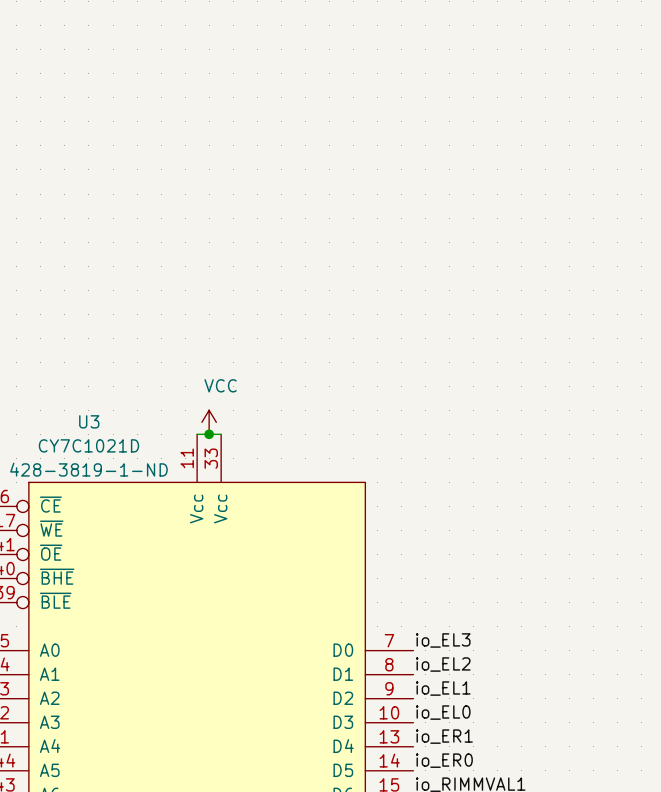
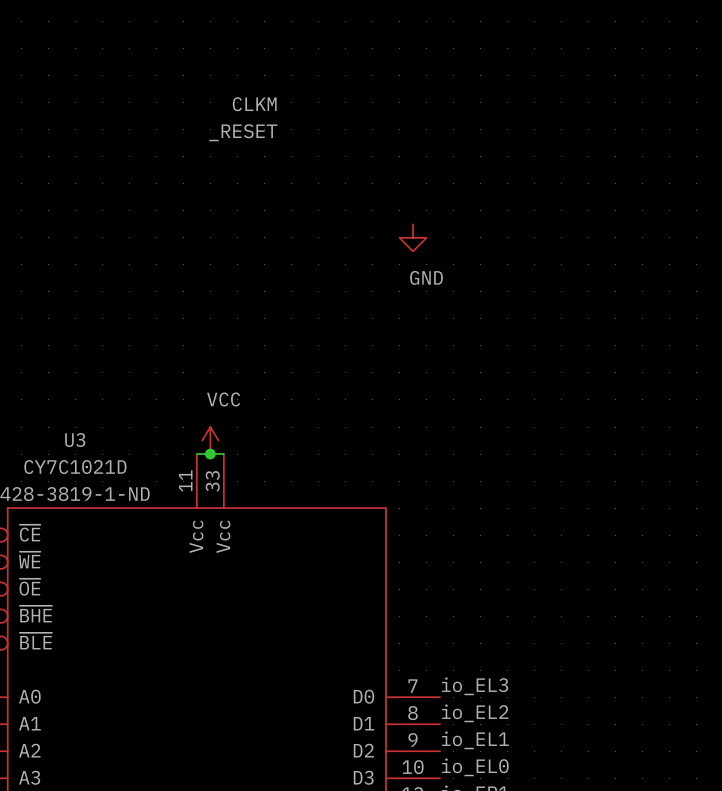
label: none -> CLKM (254, 104)
label: none -> _RESET (243, 132)
power symbol: none -> GND (413, 237)

